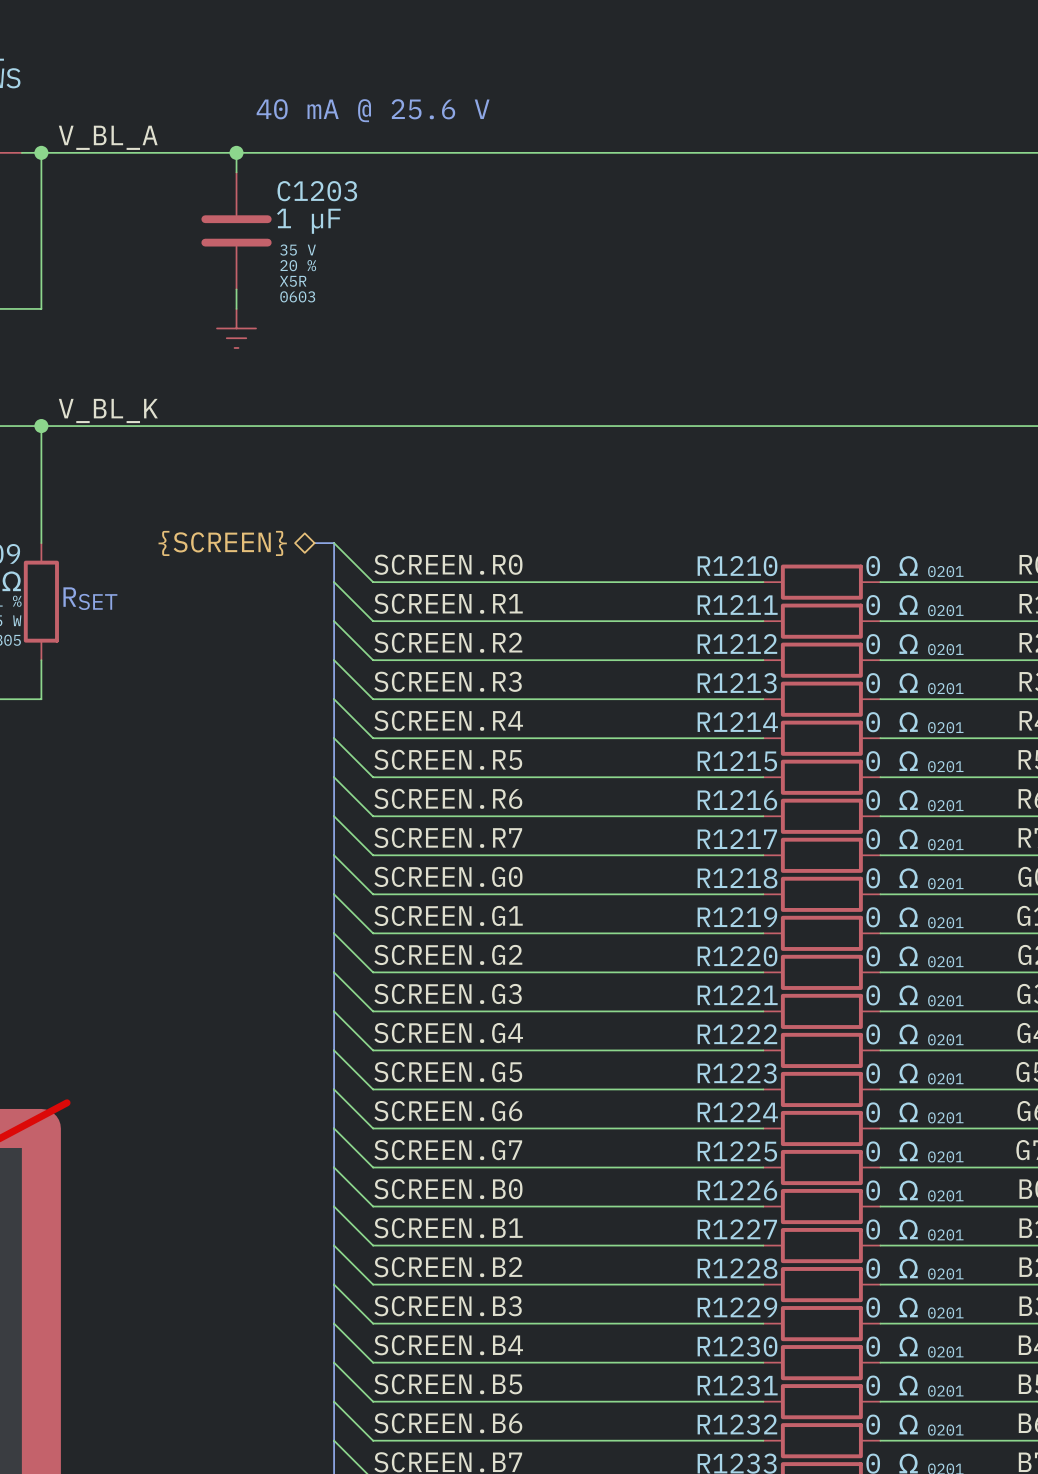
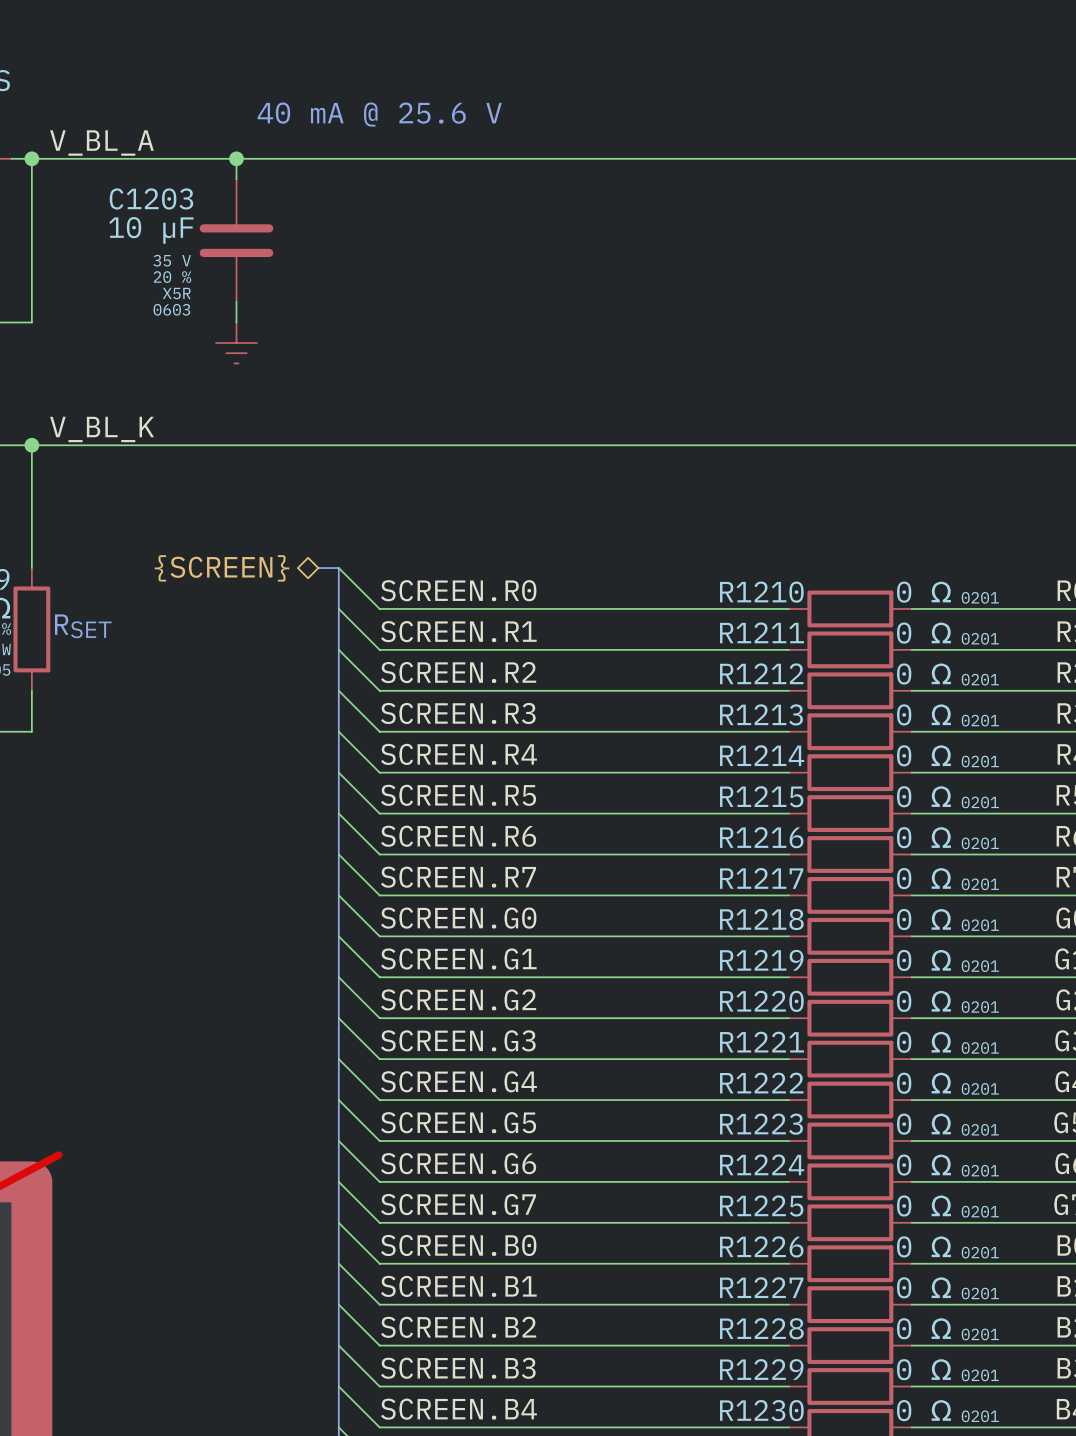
C1203 name position: C1203 (317, 191) -> C1203 (151, 198)
C1203 value: 1 µF (308, 221) -> 10 µF (151, 230)
C1203 text position: 35 V (298, 250) -> 35 V (172, 260)
C1203 text position: 20 % (298, 265) -> 20 % (172, 277)
C1203 text position: X5R (293, 281) -> X5R (176, 293)
C1203 text position: 0603 (297, 296) -> 0603 (171, 309)

